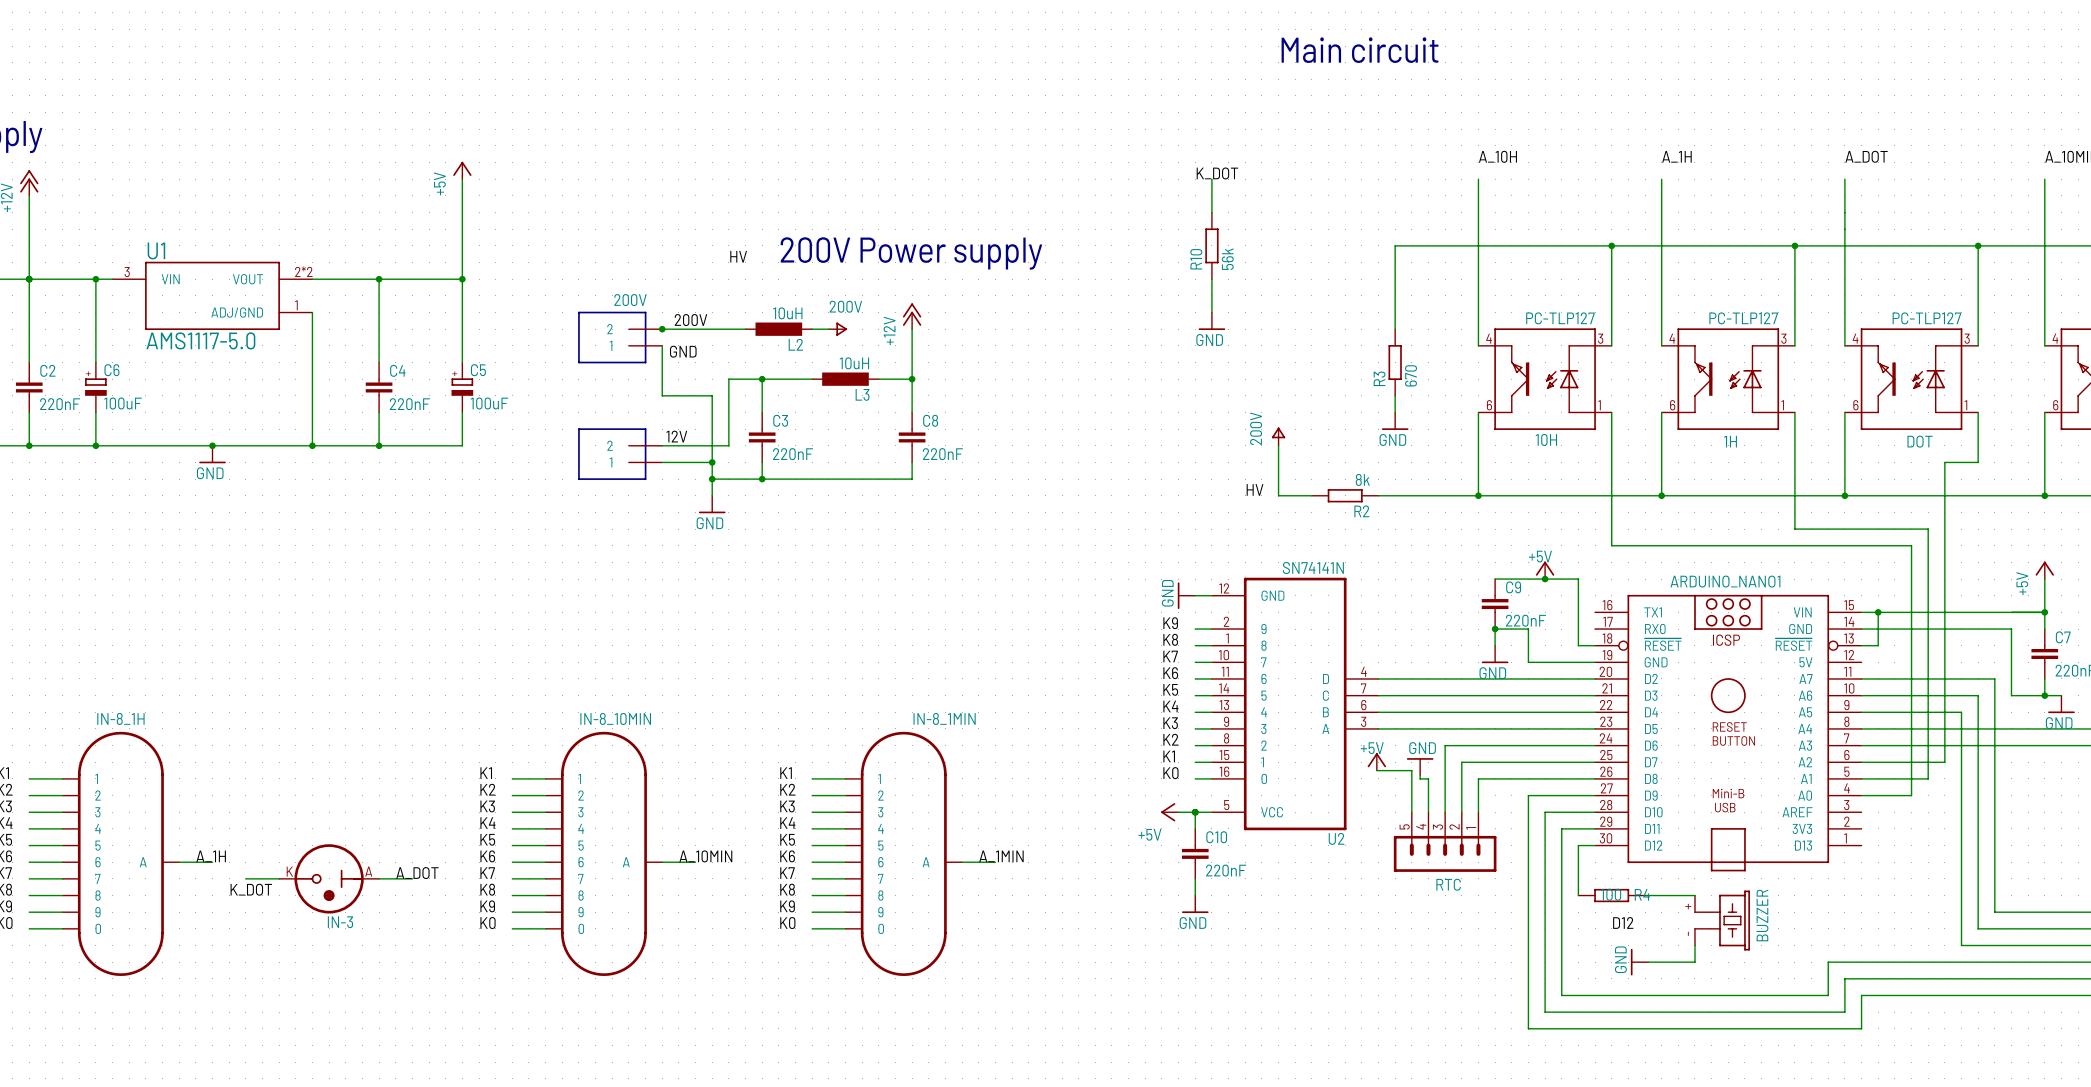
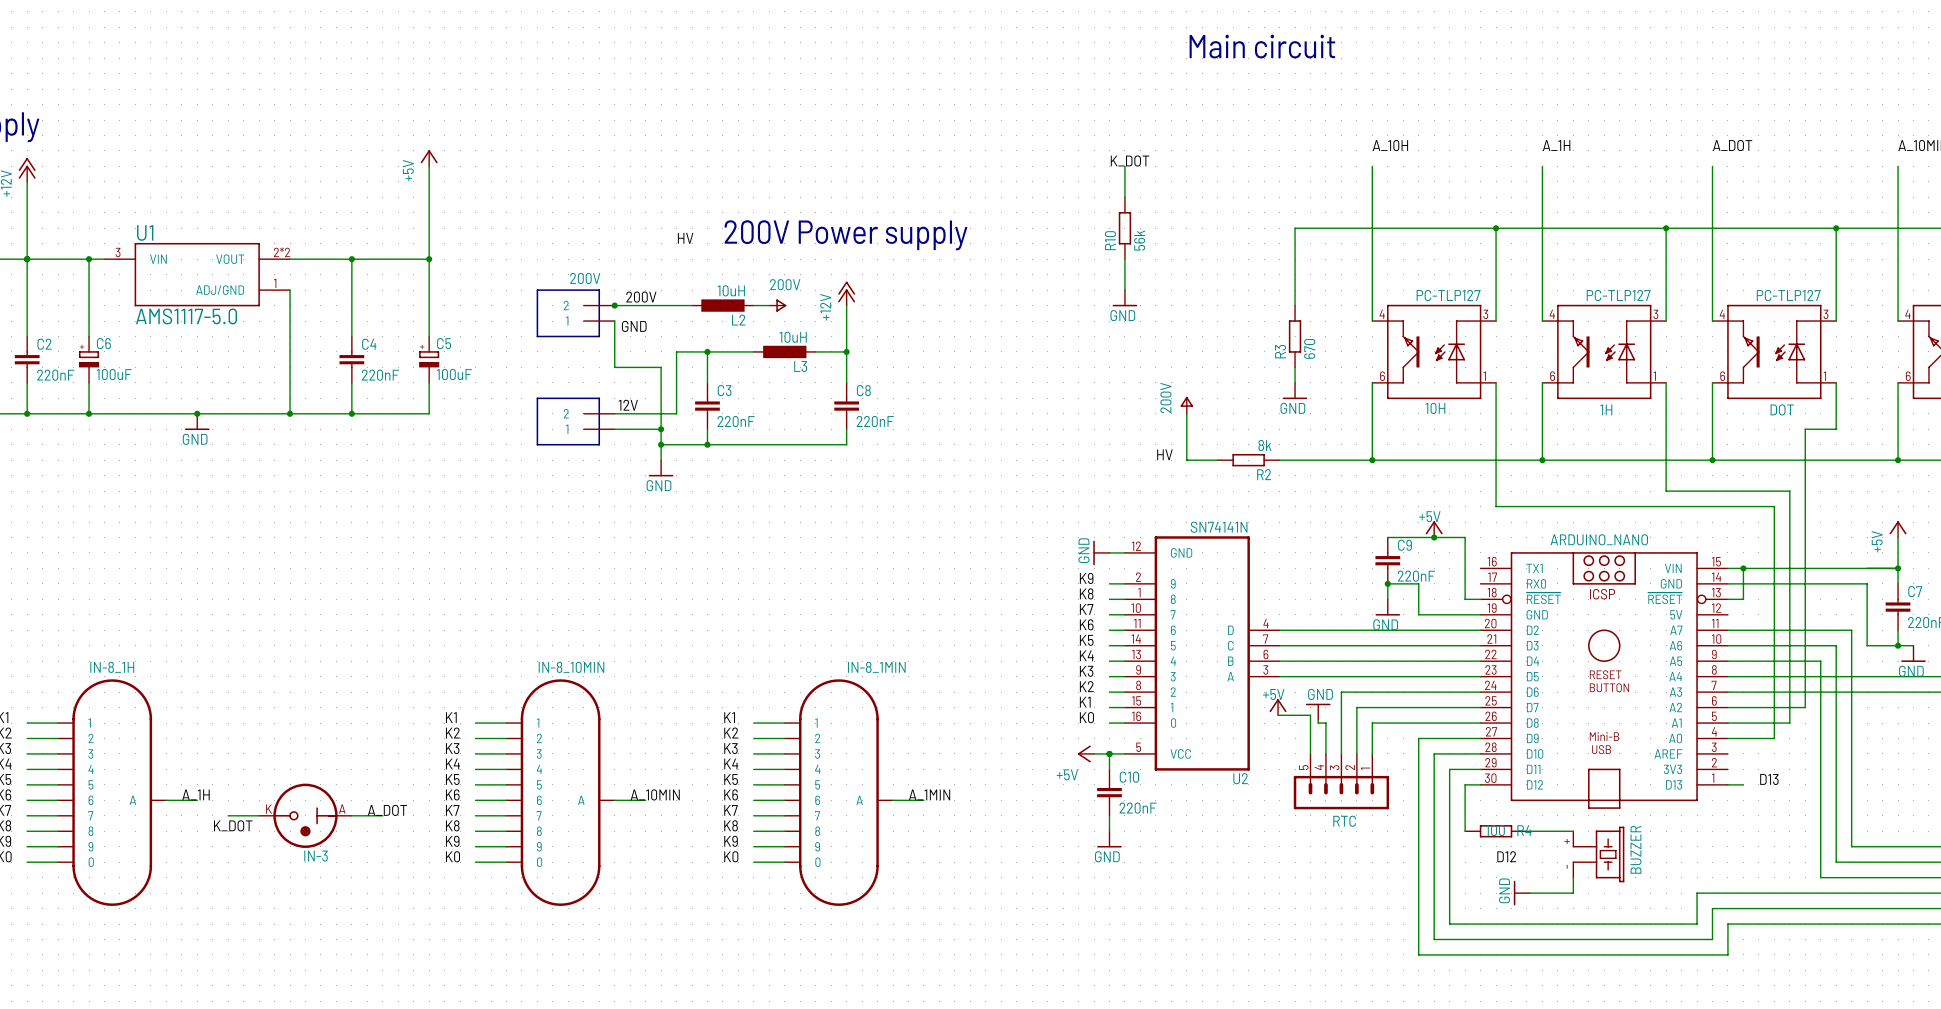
ARDUINO_NANO1 name: ARDUINO_NANO1 (1725, 581) -> ARDUINO_NANO (1599, 539)
label: none -> D13 (1769, 779)
wire: none -> (1727, 784) (1743, 784)

